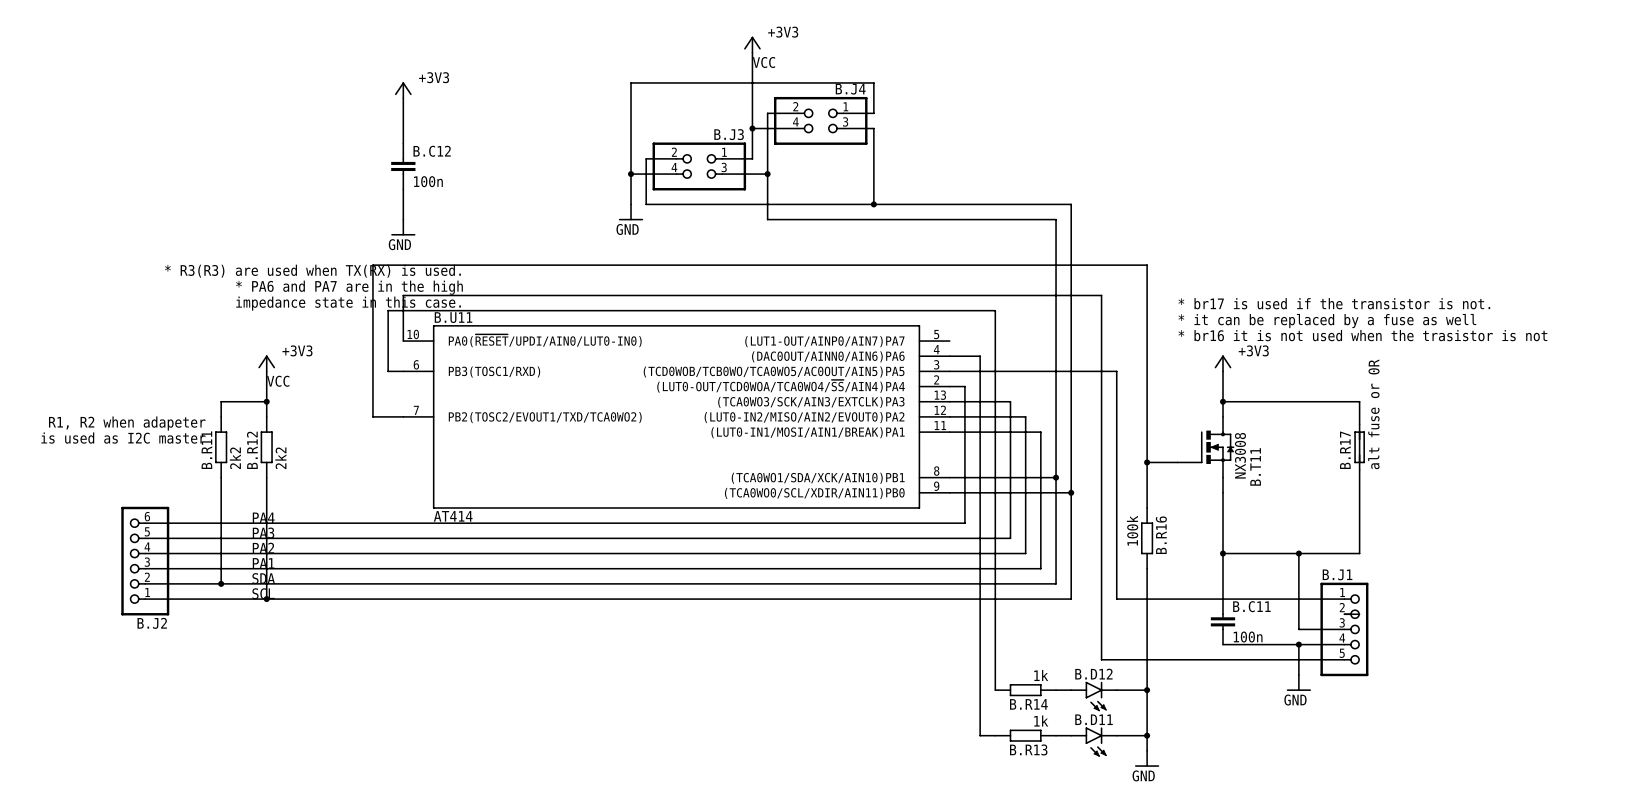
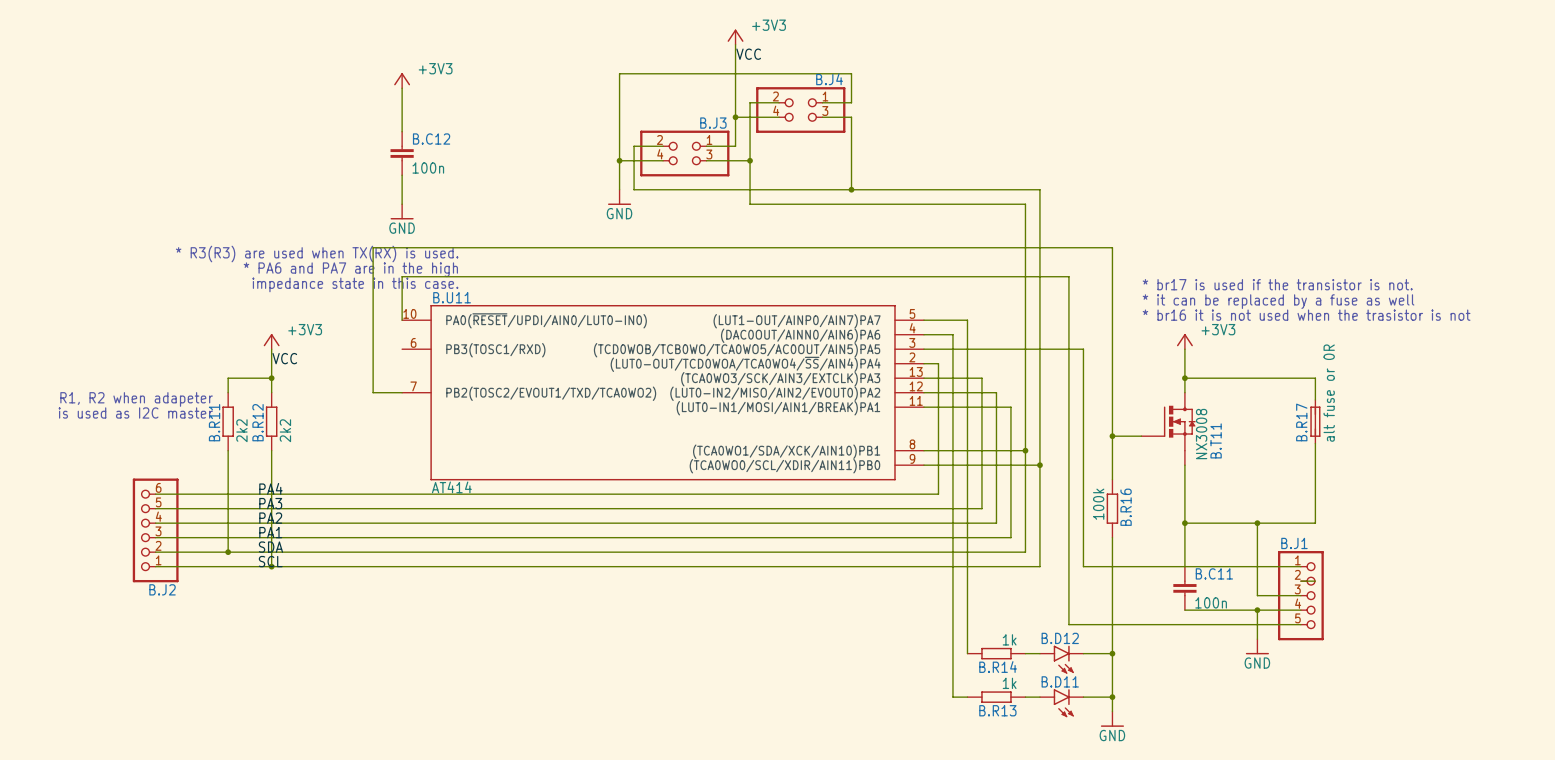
wire: (995, 341) (995, 310) (388, 310) (388, 371) (403, 371) -> (967, 320) (923, 320)

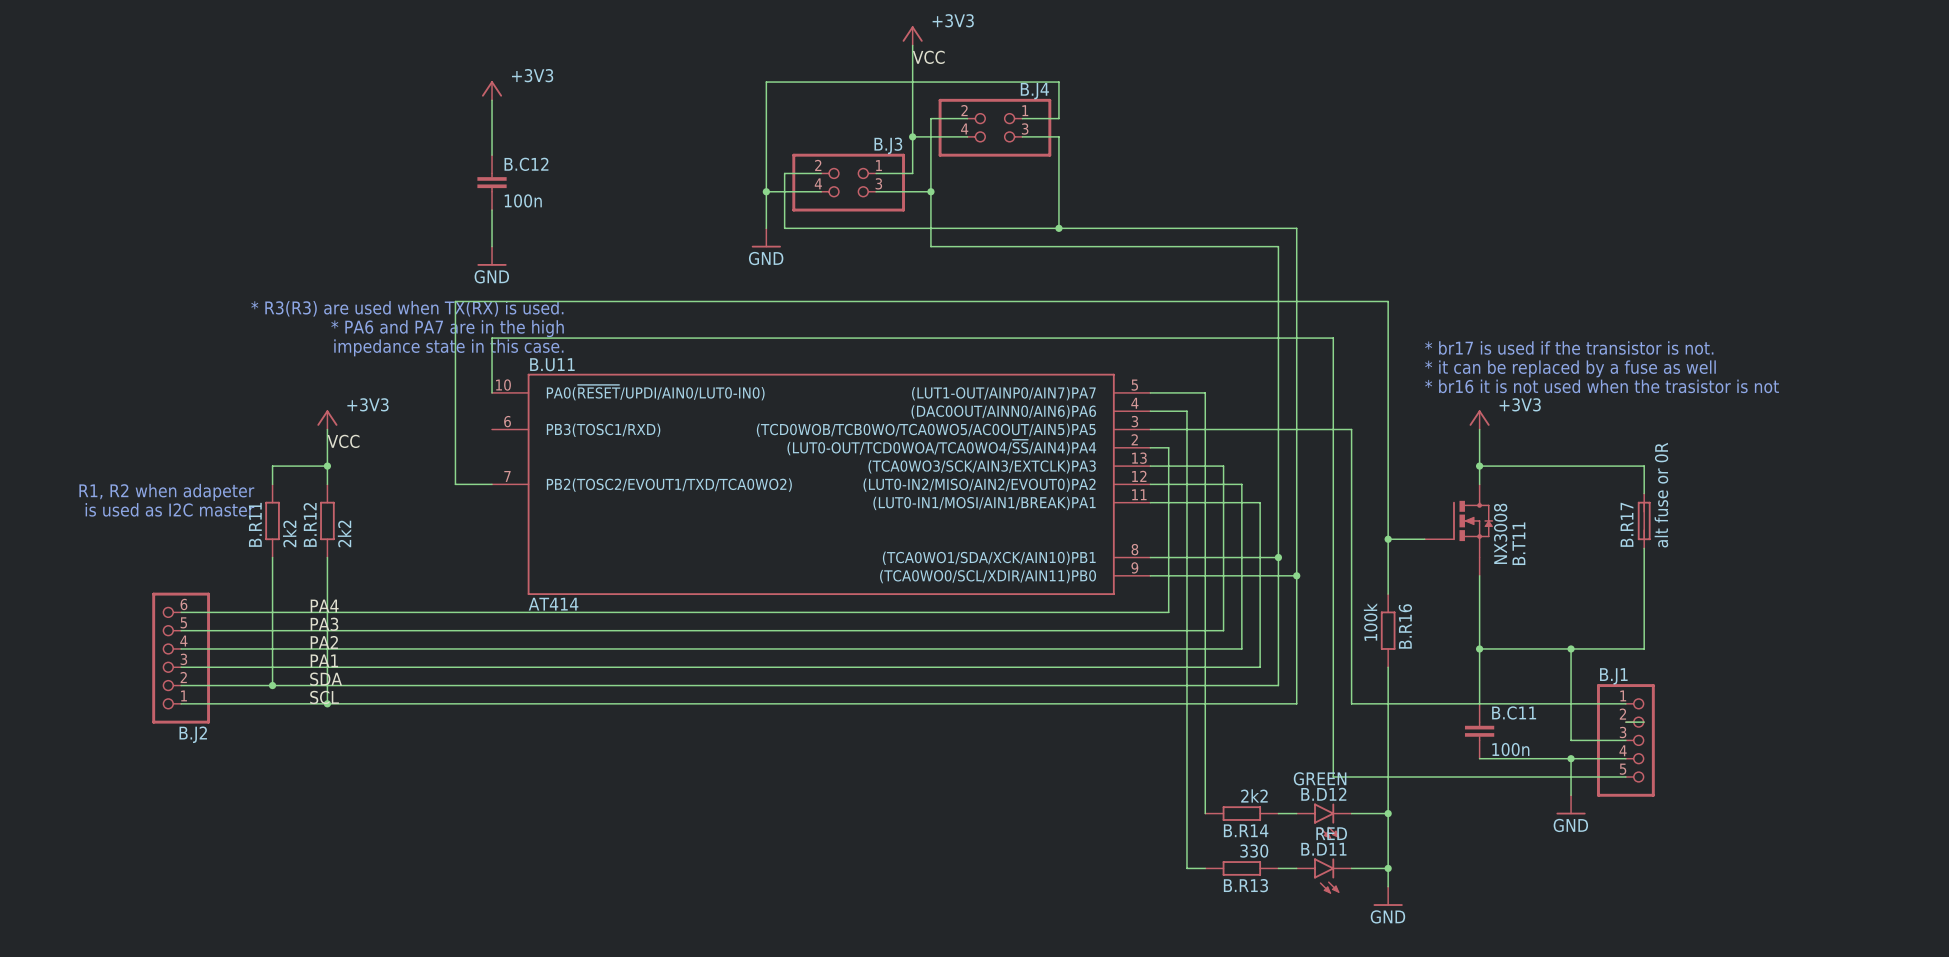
B.D12 value: none -> GREEN (1320, 778)
B.R14 value: 1k (1009, 639) -> 2k2 (1254, 795)
B.D11 value: none -> RED (1331, 833)
B.R13 value: 1k (1009, 683) -> 330 (1254, 851)

